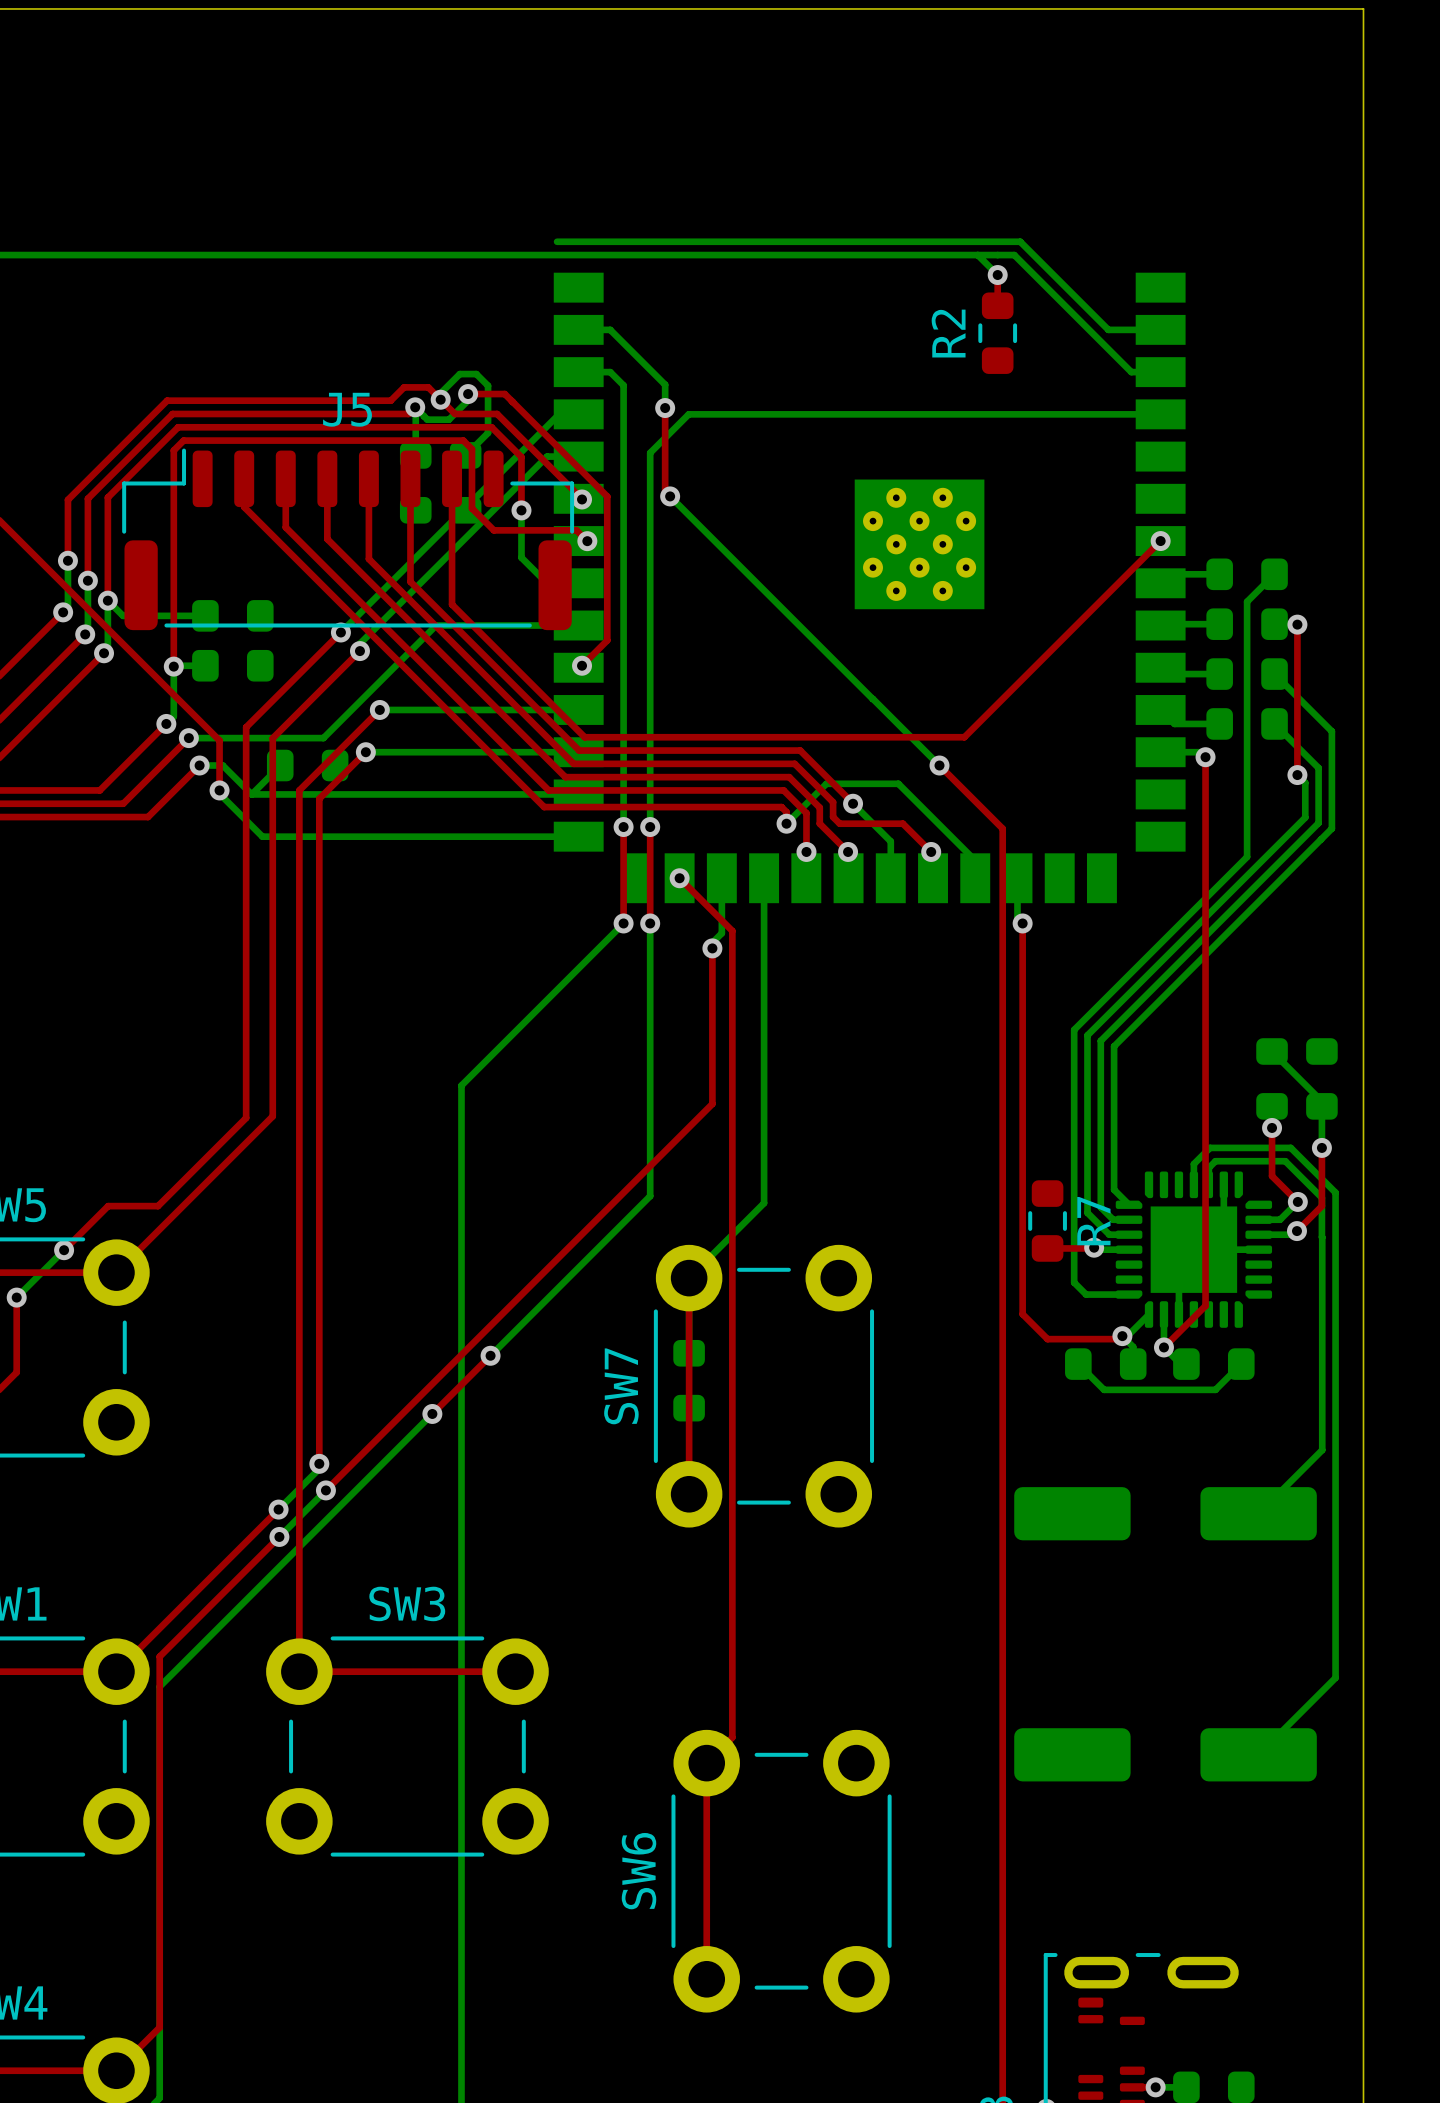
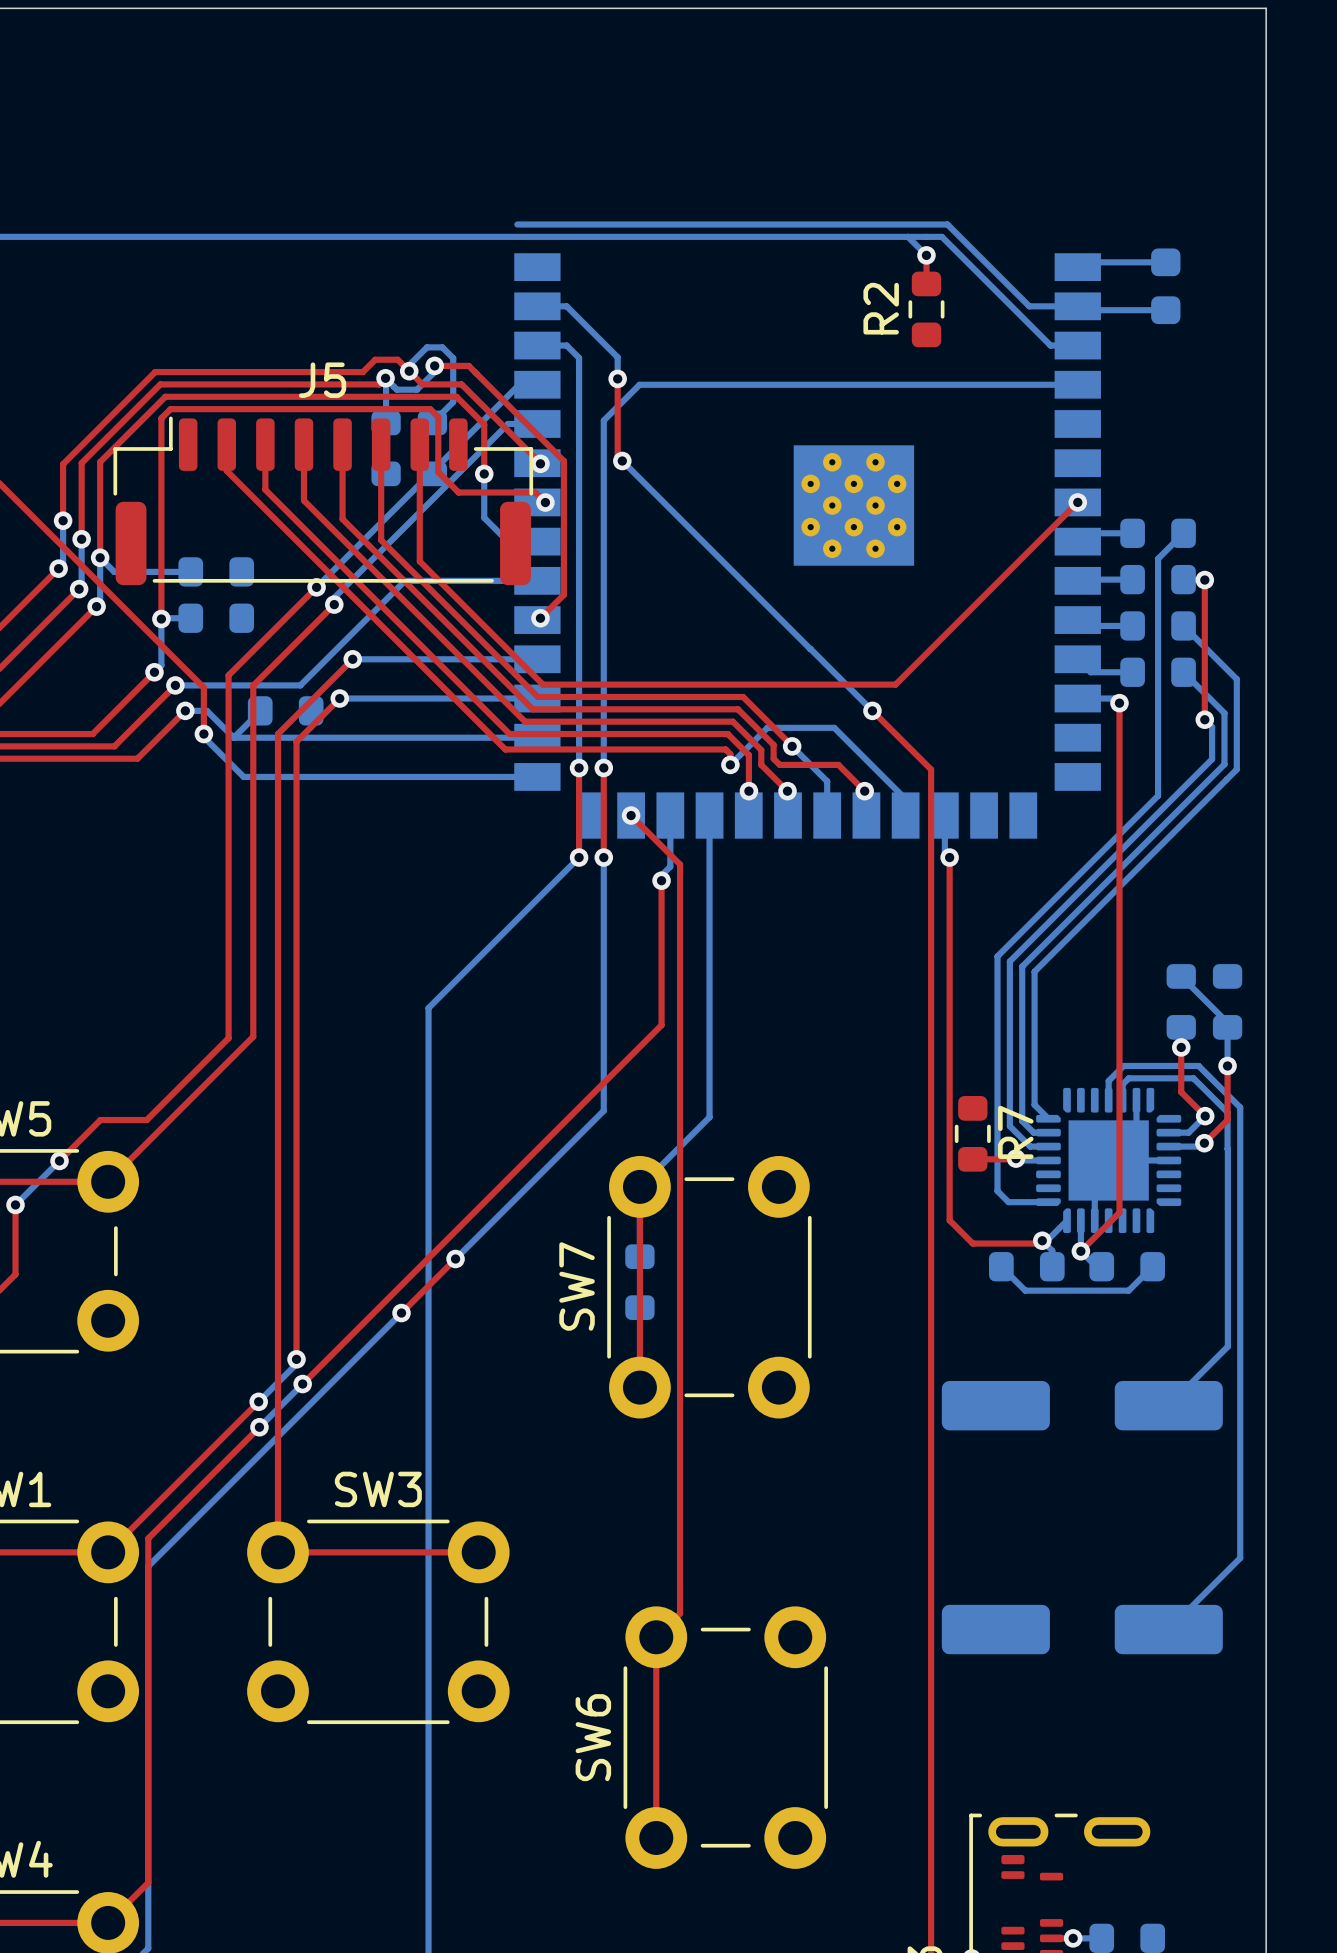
bottom track: none -> (1165, 262) (1082, 262) (1077, 267)
part: none -> (1165, 286)
bottom track: none -> (1077, 306) (1081, 310) (1165, 310)

